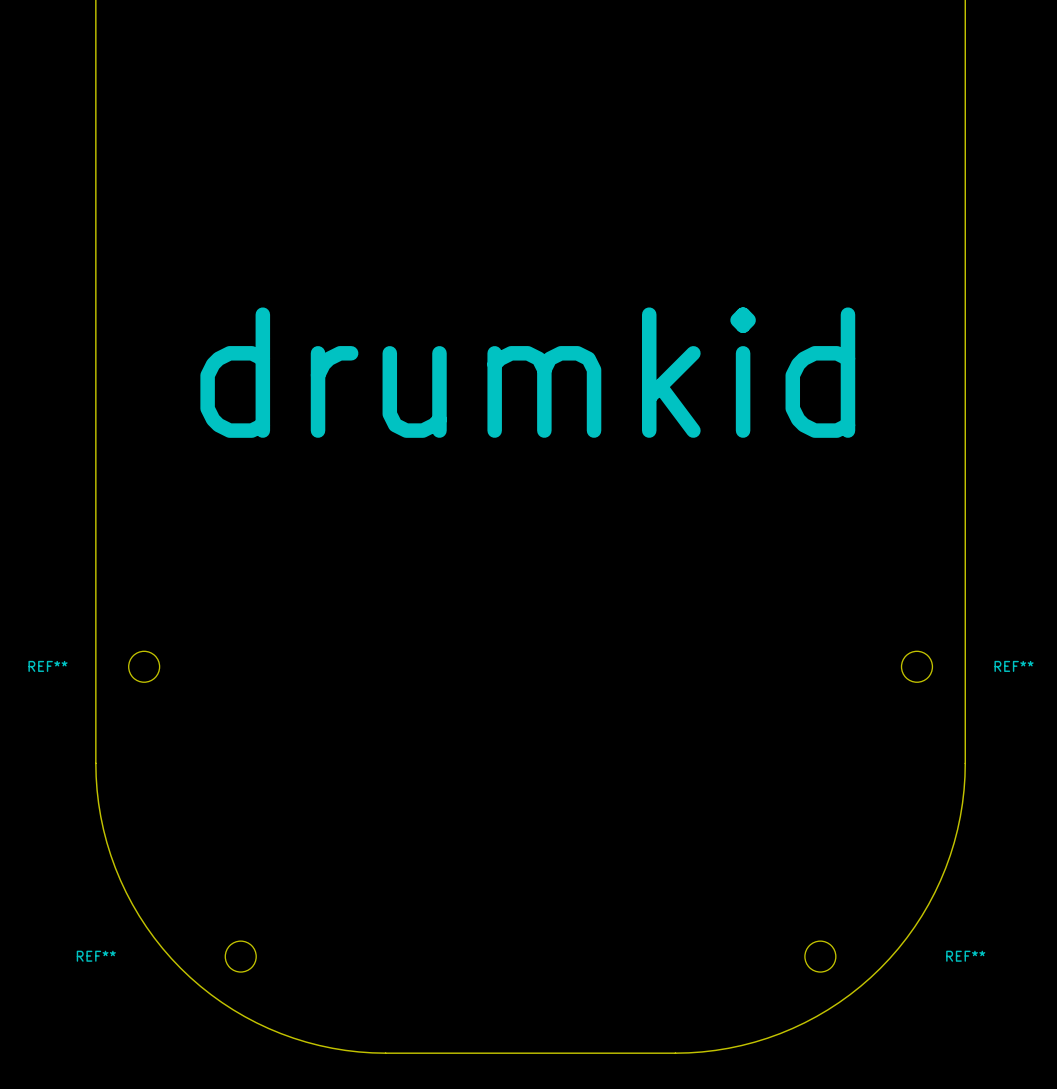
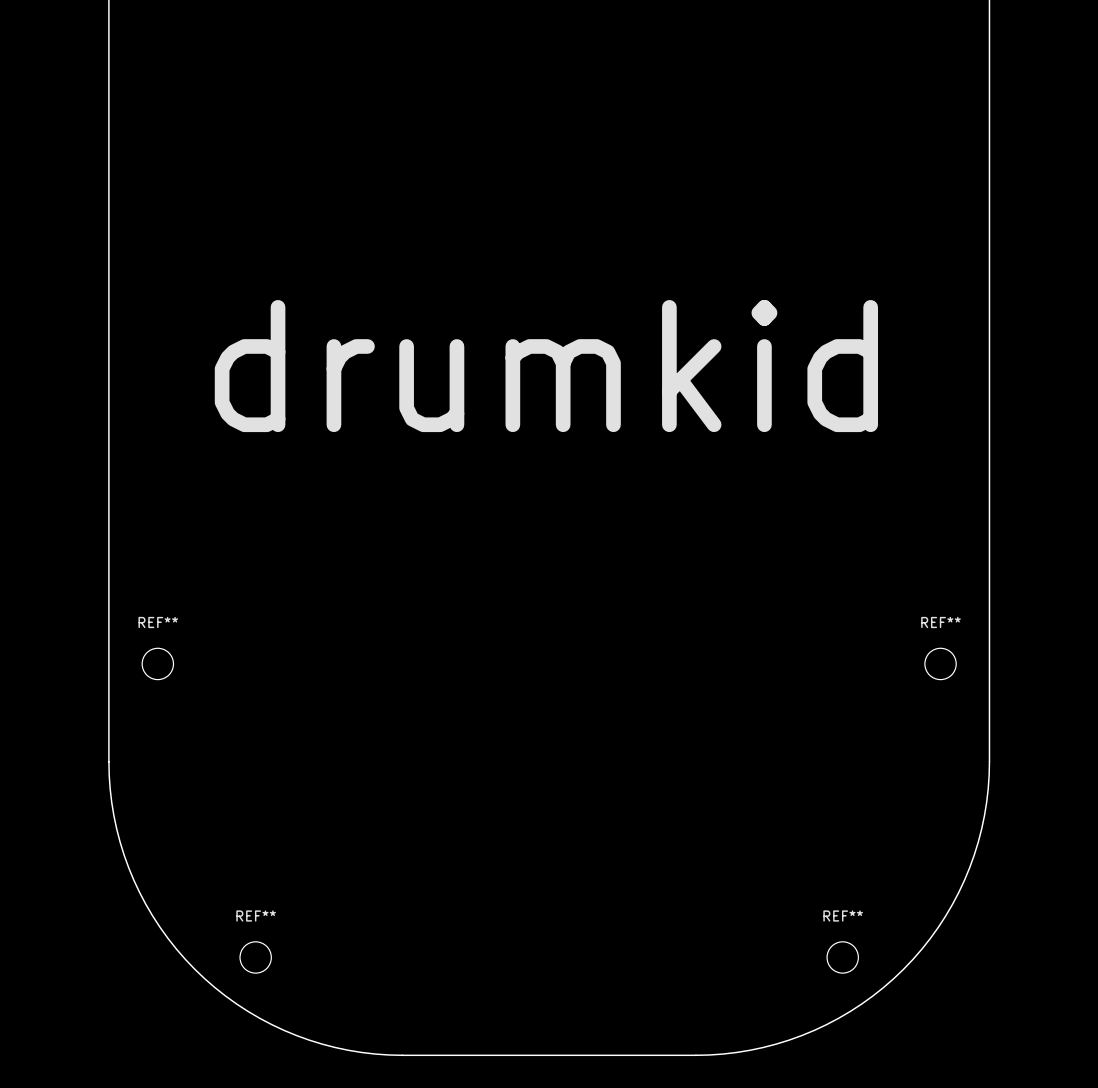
REF** name position: REF** (48, 666) -> REF** (158, 622)
REF** name position: REF** (1014, 666) -> REF** (941, 622)
REF** name position: REF** (96, 956) -> REF** (256, 916)
REF** name position: REF** (965, 956) -> REF** (843, 916)

